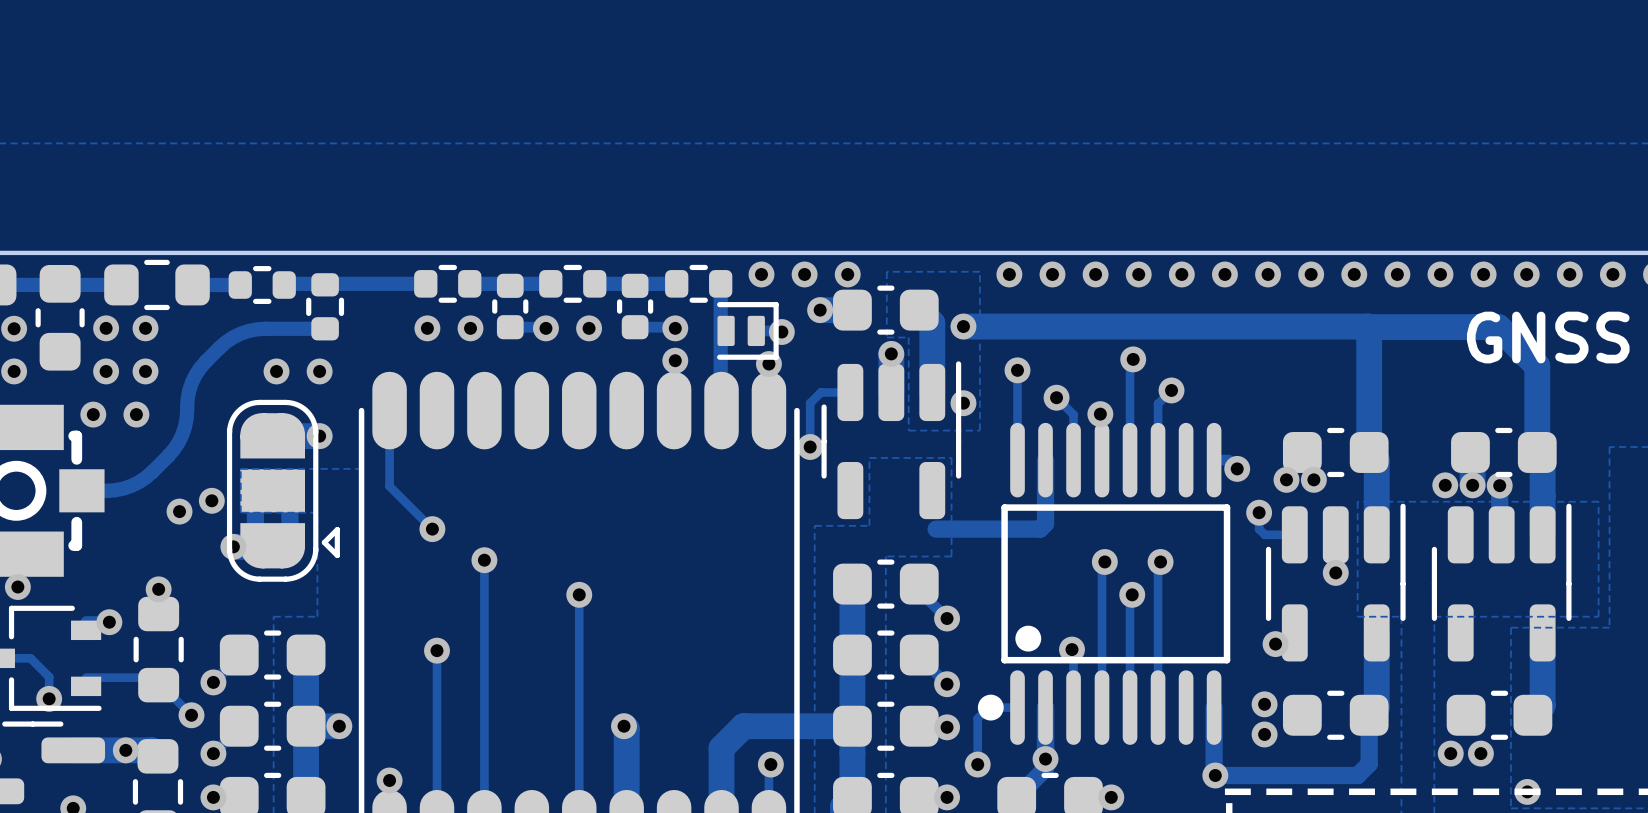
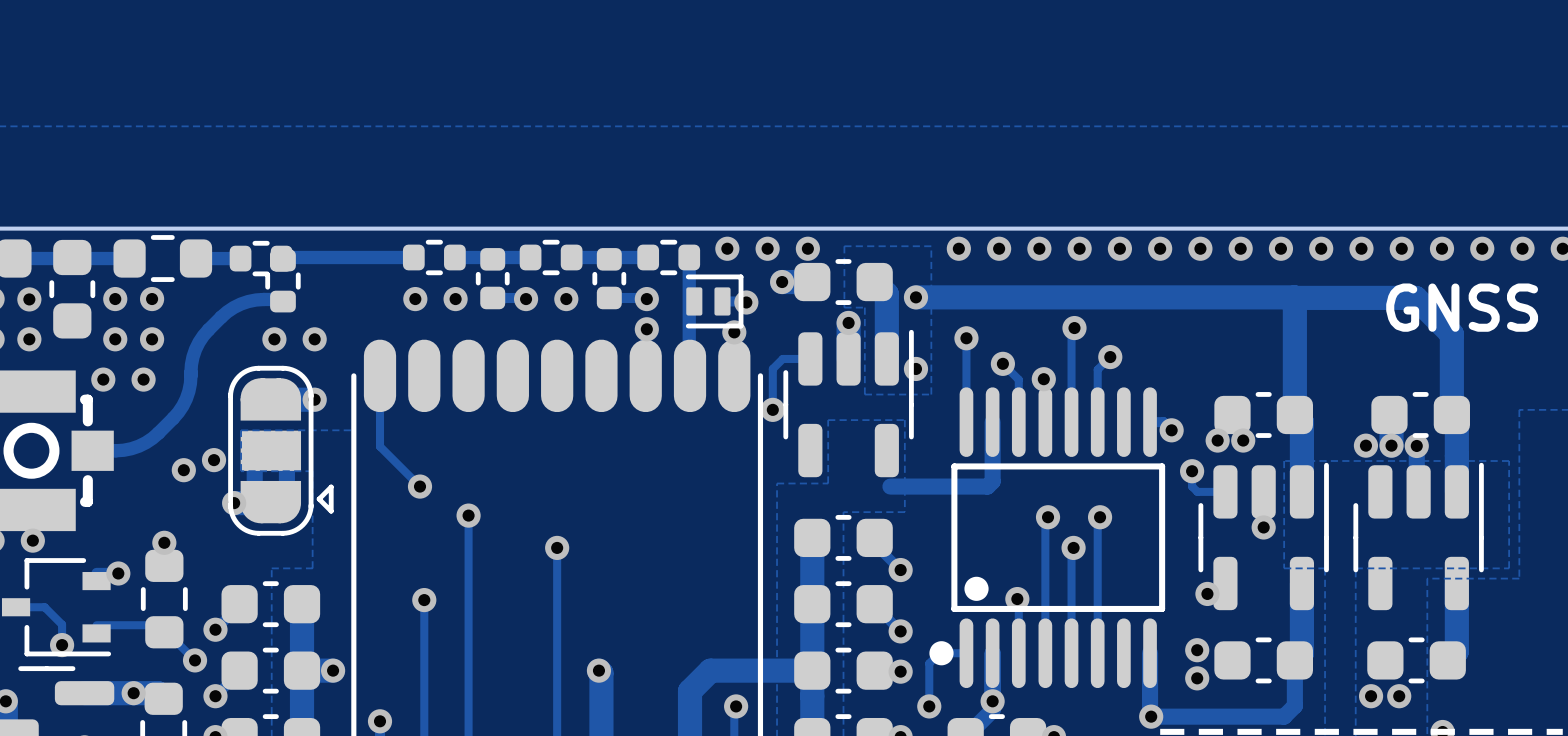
part position: (325, 306) -> (282, 281)
track: (284, 328) (325, 328) -> none

